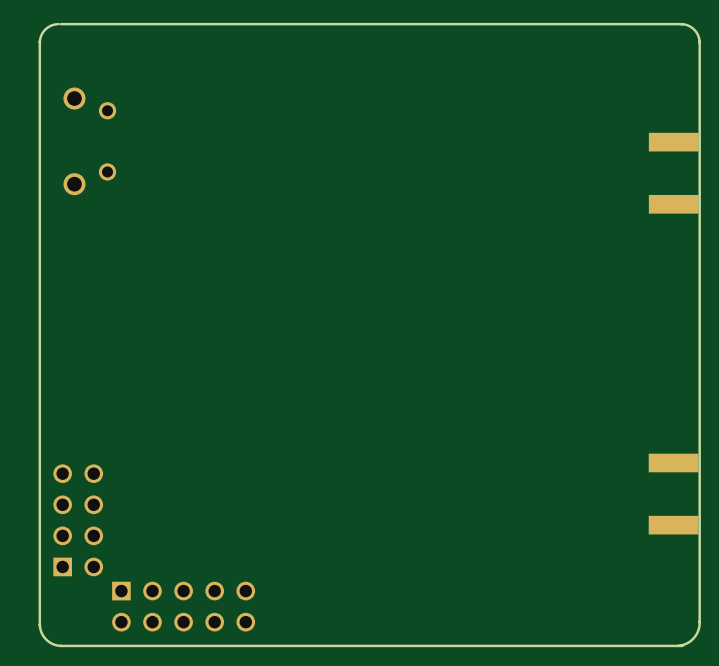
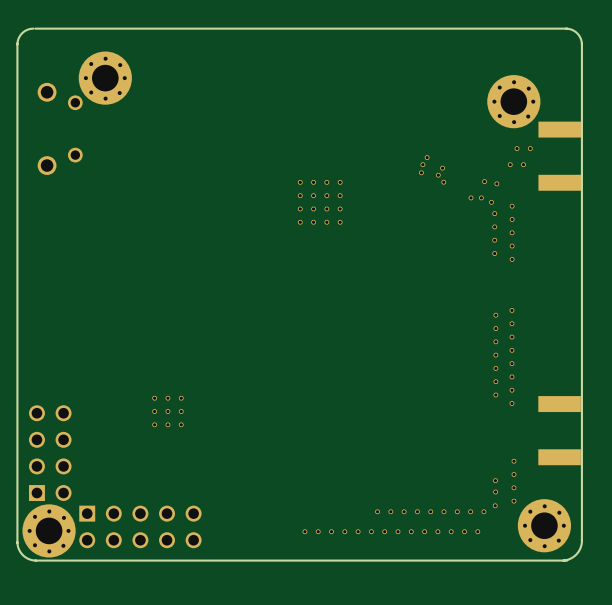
part: none -> (105, 78)
part: none -> (513, 101)
part: none -> (517, 148)
part: none -> (530, 148)
part: none -> (427, 157)
part: none -> (422, 164)
part: none -> (510, 164)
part: none -> (523, 164)
part: none -> (442, 168)
part: none -> (421, 172)
part: none -> (438, 175)
part: none -> (484, 181)
part: none -> (300, 182)
part: none -> (313, 182)
part: none -> (326, 182)
part: none -> (340, 182)
part: none -> (443, 182)
part: none -> (496, 183)
part: none -> (300, 195)
part: none -> (313, 195)
part: none -> (326, 195)
part: none -> (340, 195)
part: none -> (471, 197)
part: none -> (481, 197)
part: none -> (491, 202)
part: none -> (512, 206)
part: none -> (300, 208)
part: none -> (313, 208)
part: none -> (326, 208)
part: none -> (340, 208)
part: none -> (494, 213)
part: none -> (512, 219)
part: none -> (300, 222)
part: none -> (313, 222)
part: none -> (326, 222)
part: none -> (340, 222)
part: none -> (494, 226)
part: none -> (512, 232)
part: none -> (494, 240)
part: none -> (512, 246)
part: none -> (494, 253)
part: none -> (512, 259)
part: none -> (511, 310)
part: none -> (495, 315)
part: none -> (511, 323)
part: none -> (495, 328)
part: none -> (511, 337)
part: none -> (495, 341)
part: none -> (511, 350)
part: none -> (495, 355)
part: none -> (511, 363)
part: none -> (495, 368)
part: none -> (511, 376)
part: none -> (495, 381)
part: none -> (511, 390)
part: none -> (495, 395)
part: none -> (154, 398)
part: none -> (167, 398)
part: none -> (181, 398)
part: none -> (511, 403)
part: none -> (154, 411)
part: none -> (167, 411)
part: none -> (181, 411)
part: none -> (154, 424)
part: none -> (167, 424)
part: none -> (181, 424)
part: none -> (513, 461)
part: none -> (513, 474)
part: none -> (495, 480)
part: none -> (513, 487)
part: none -> (495, 491)
part: none -> (513, 501)
part: none -> (495, 505)
part: none -> (377, 511)
part: none -> (390, 511)
part: none -> (404, 511)
part: none -> (417, 511)
part: none -> (430, 511)
part: none -> (444, 511)
part: none -> (457, 511)
part: none -> (470, 511)
part: none -> (483, 511)
part: none -> (544, 525)
part: none -> (49, 530)
part: none -> (304, 531)
part: none -> (318, 531)
part: none -> (331, 531)
part: none -> (344, 531)
part: none -> (358, 531)
part: none -> (371, 531)
part: none -> (384, 531)
part: none -> (398, 531)
part: none -> (411, 531)
part: none -> (424, 531)
part: none -> (437, 531)
part: none -> (451, 531)
part: none -> (464, 531)
part: none -> (477, 531)

